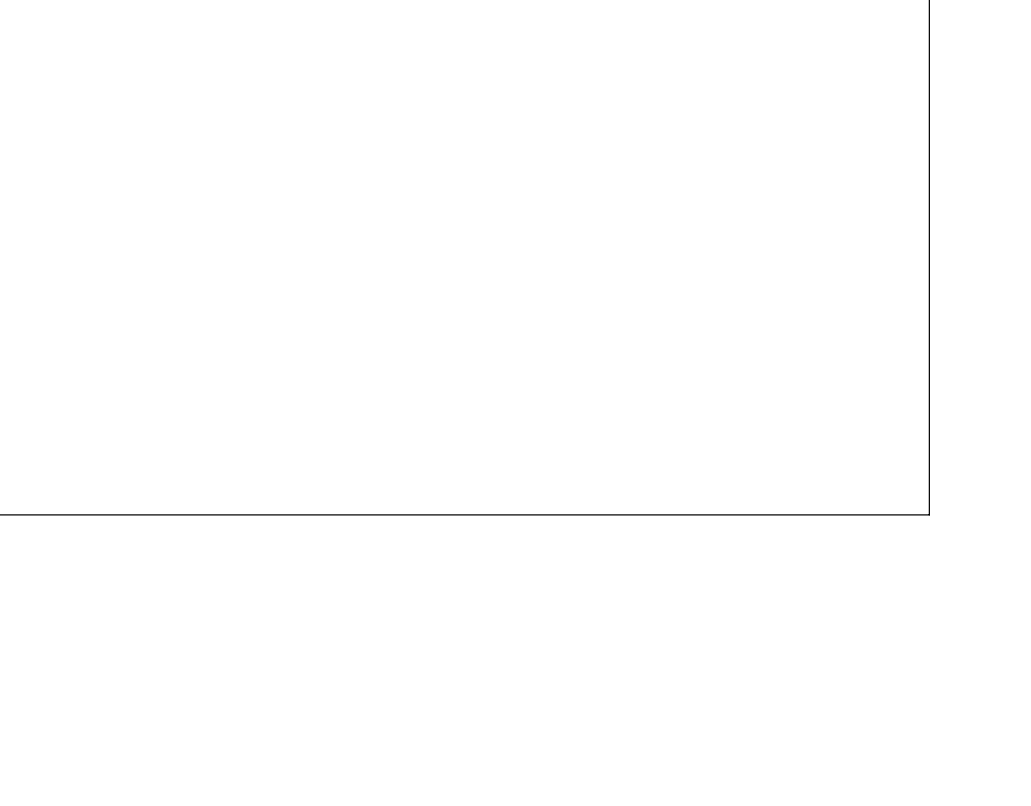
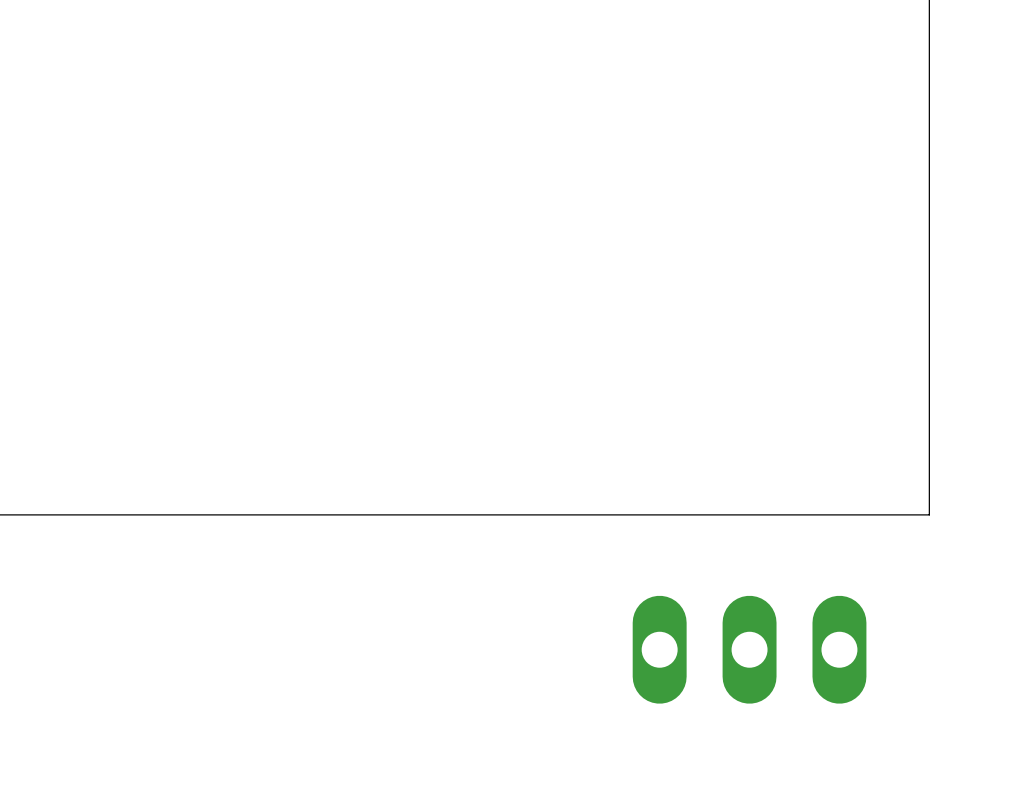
part: none -> (749, 649)

